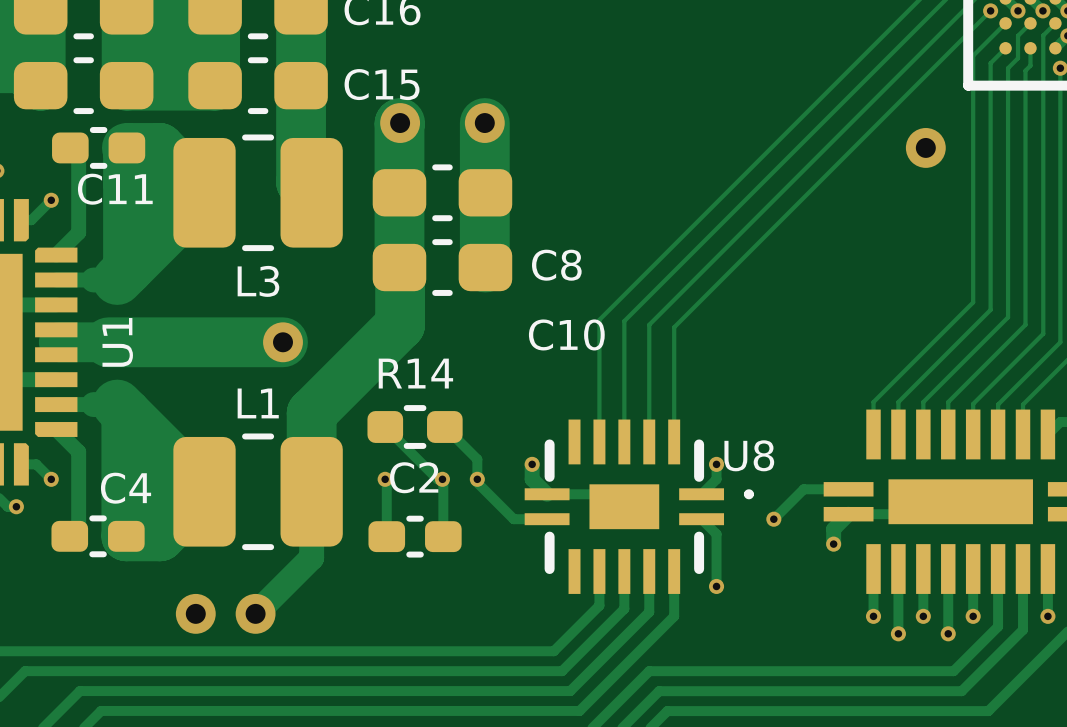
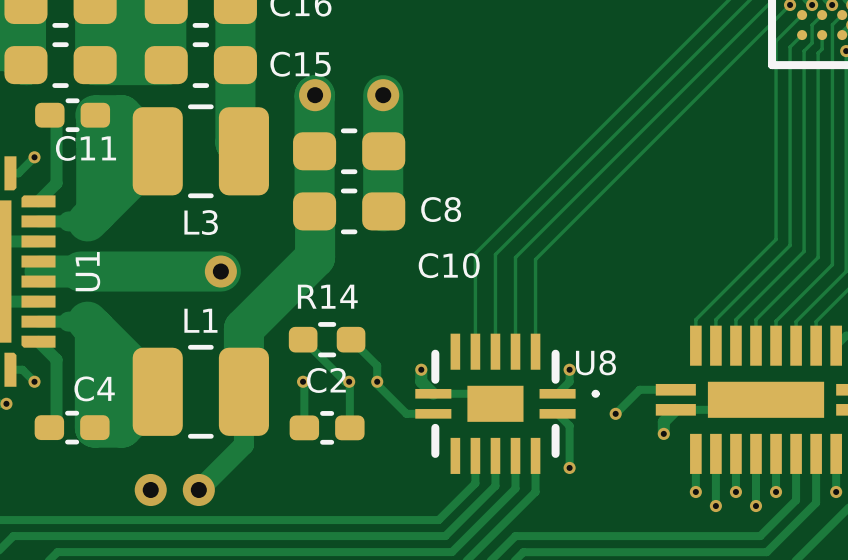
via: (925, 147) -> none

